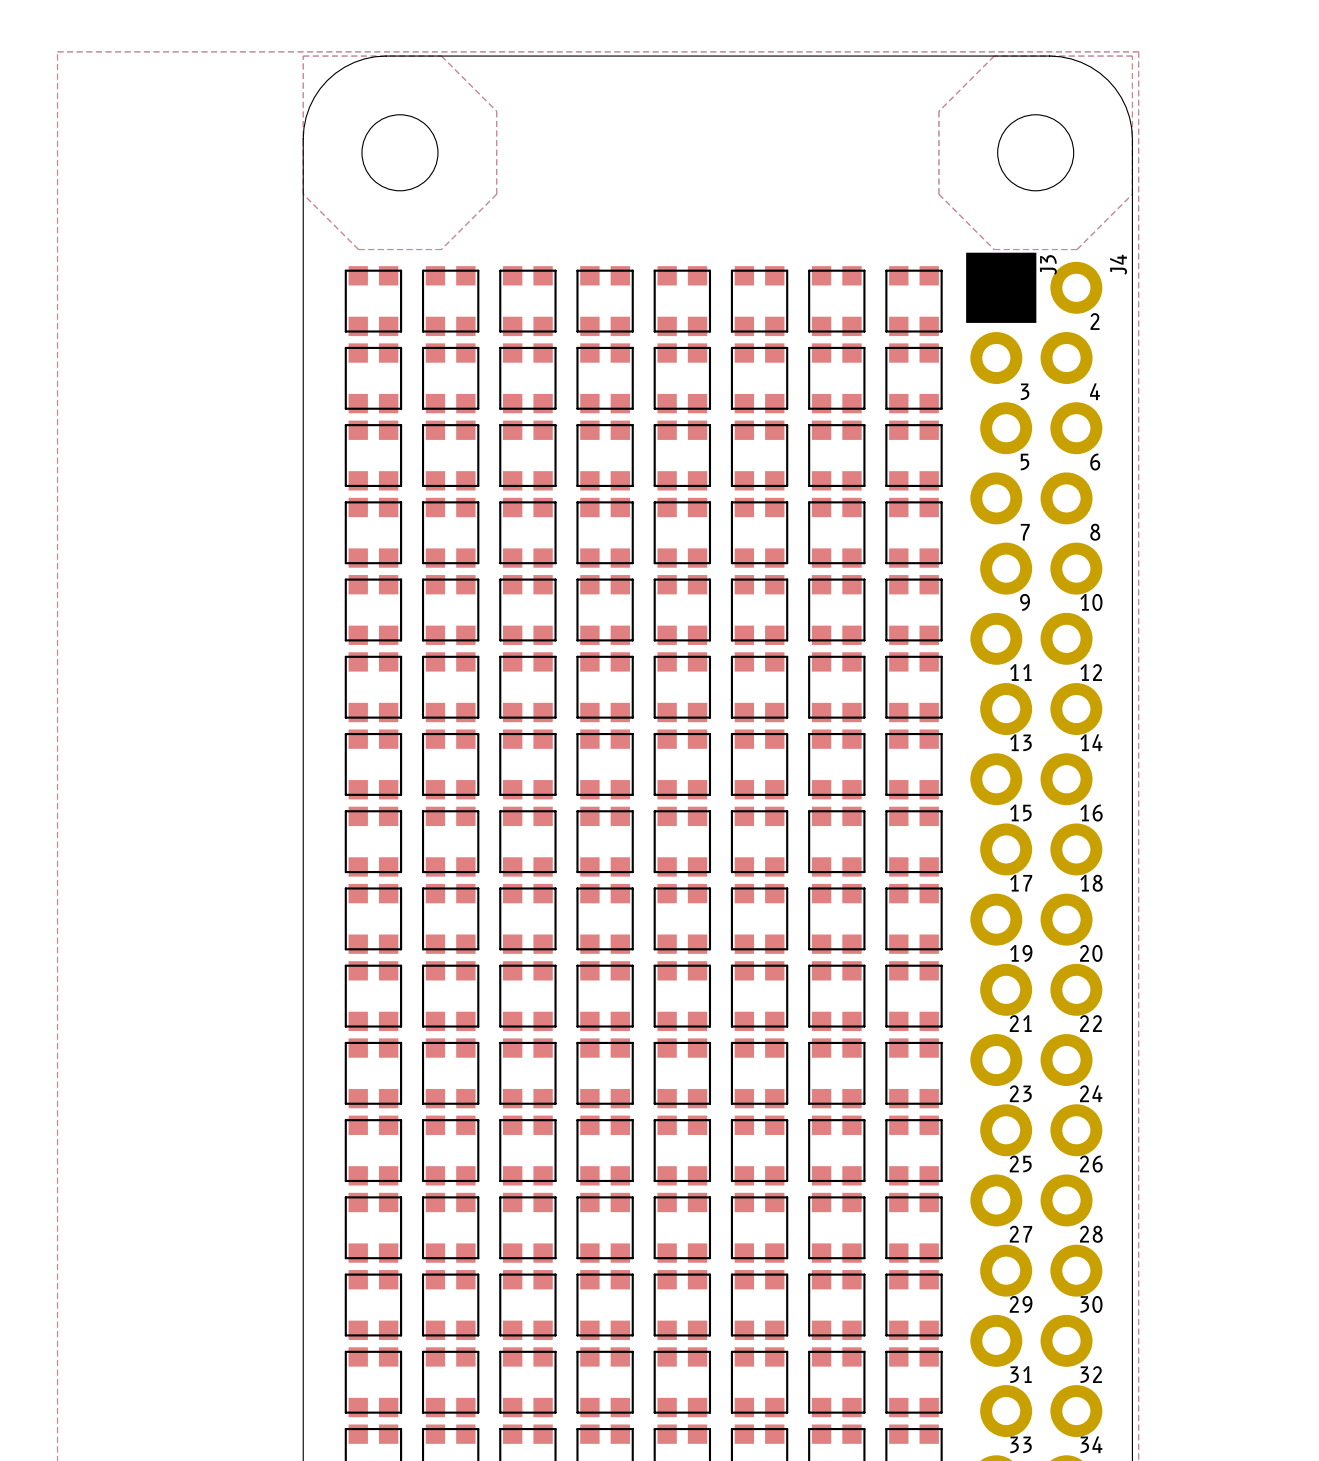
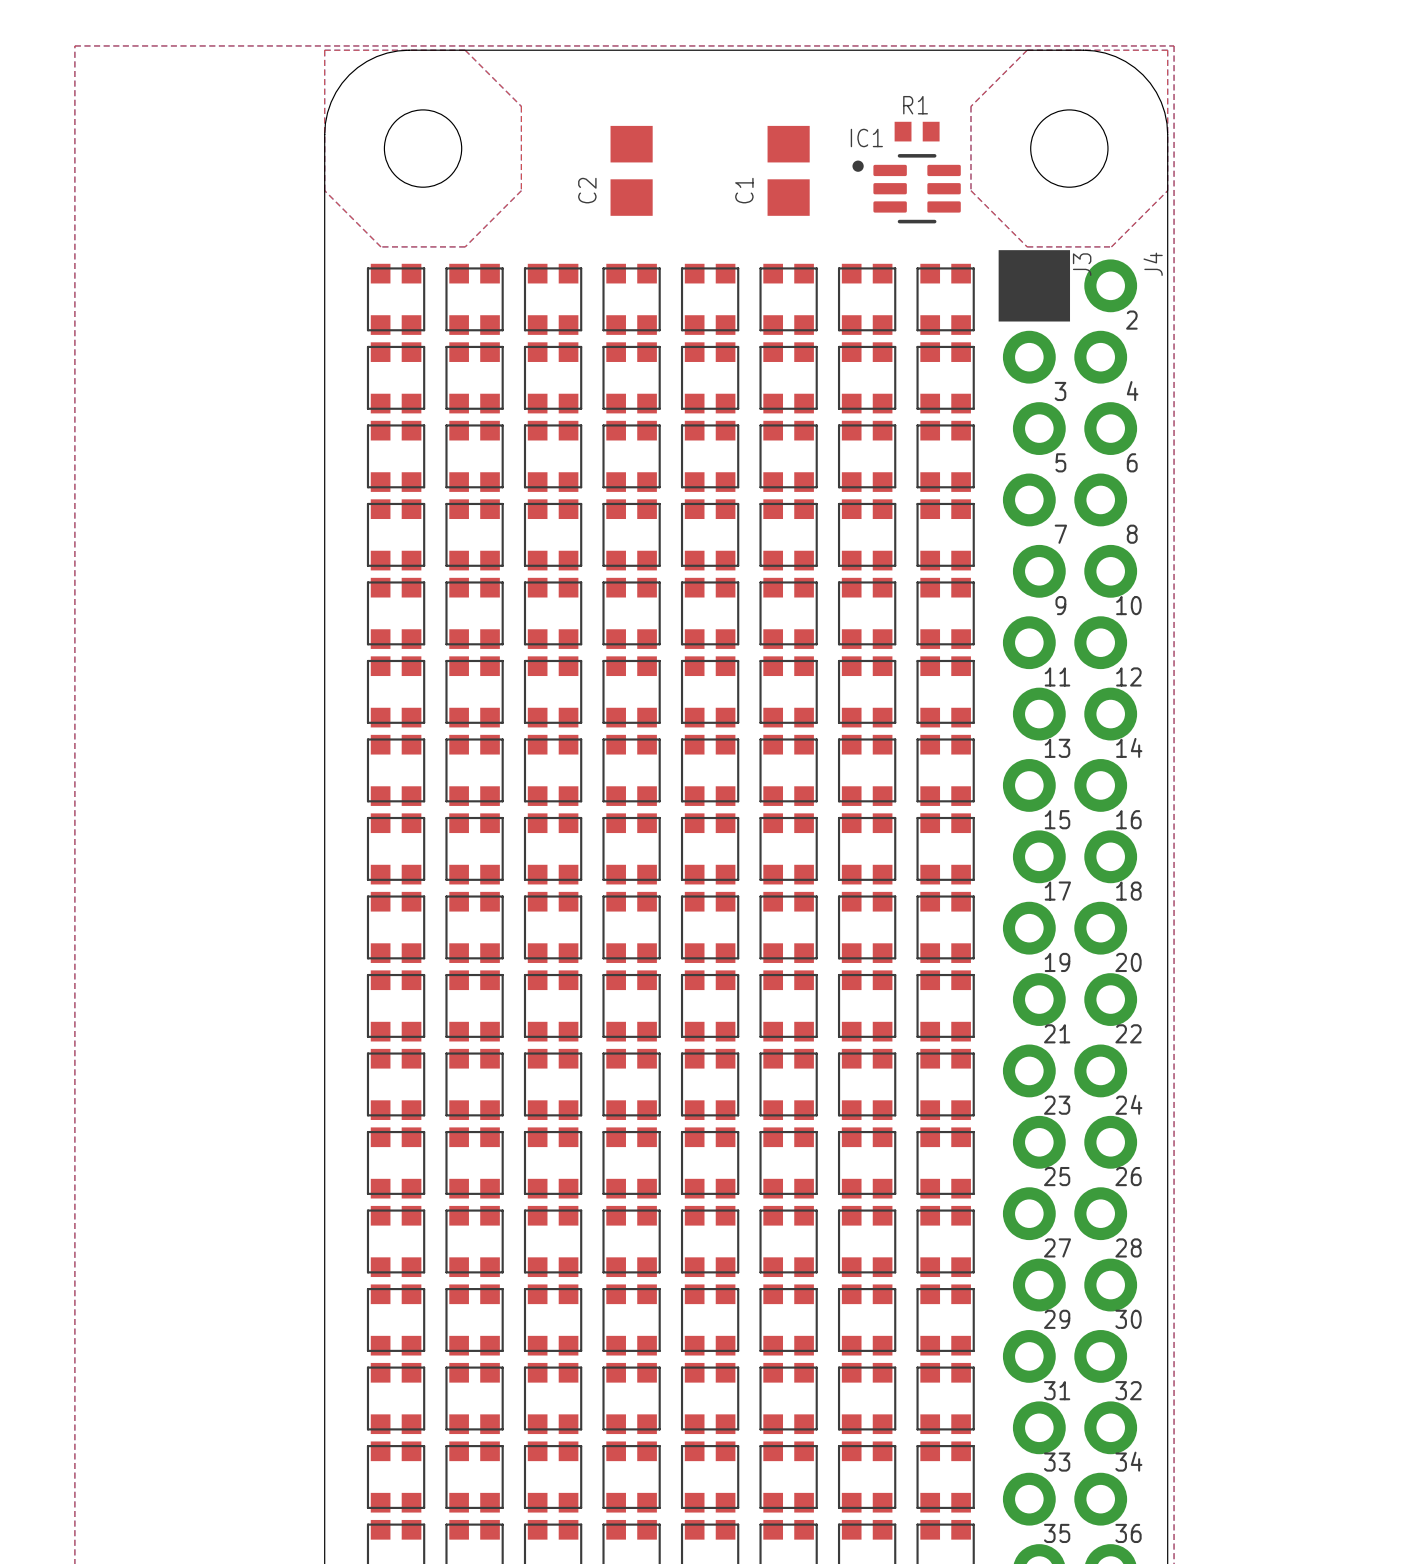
R1: none -> (917, 131)
C2: none -> (631, 170)
C1: none -> (788, 170)
IC1: none -> (906, 188)

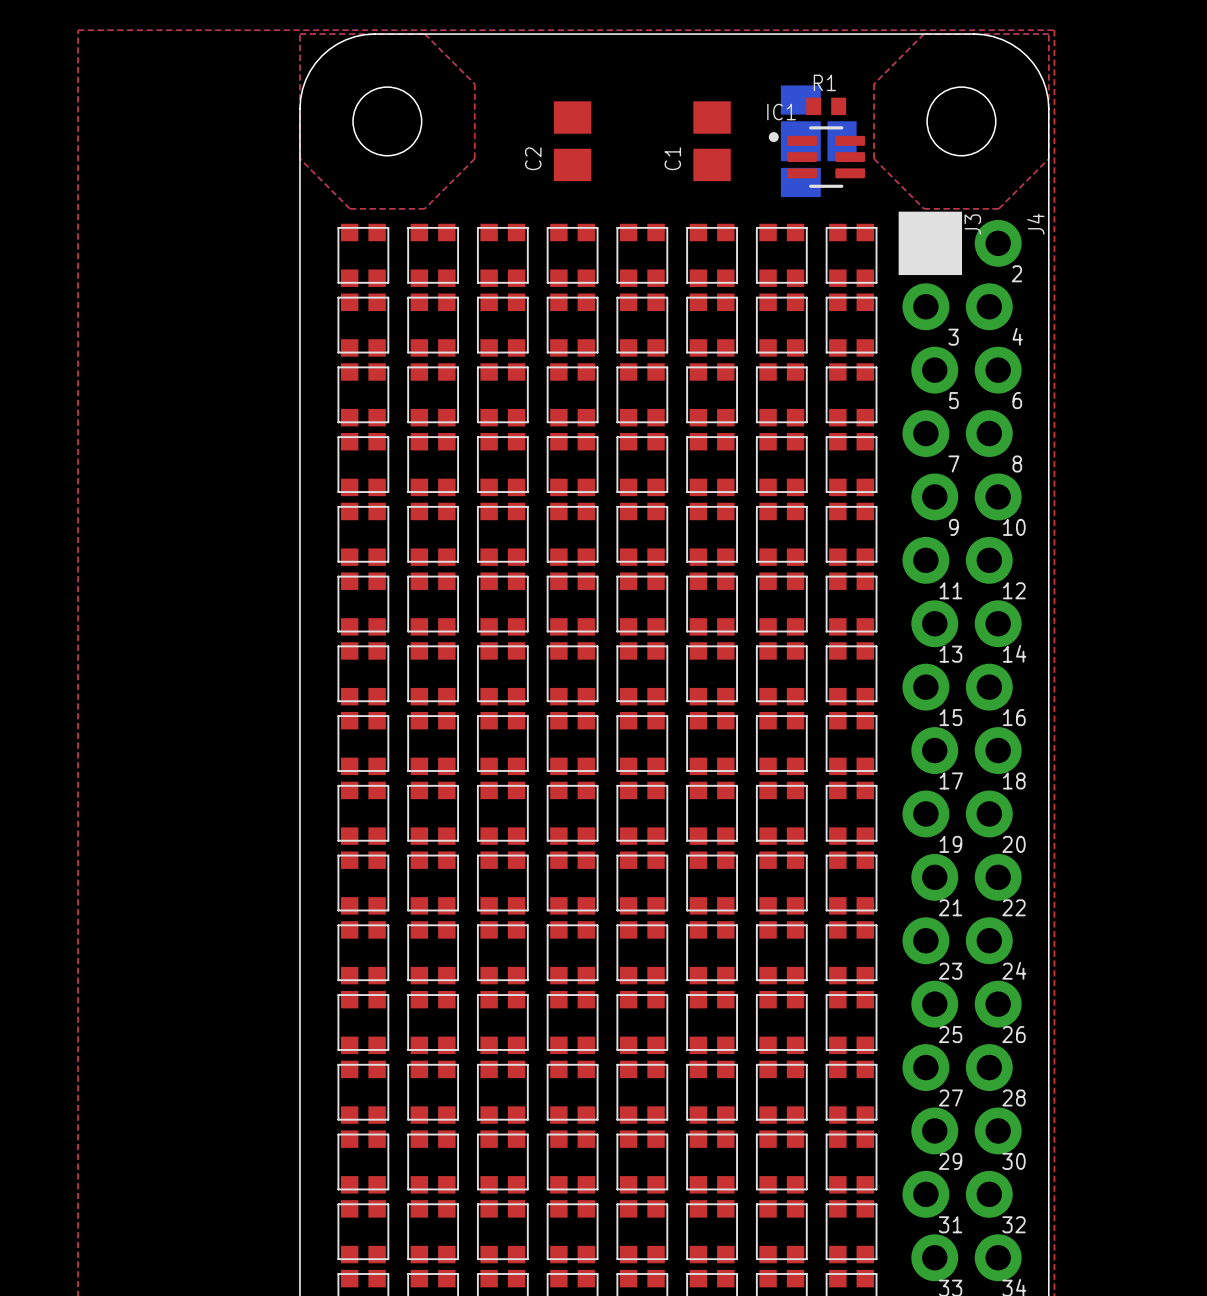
part: none -> (818, 141)

